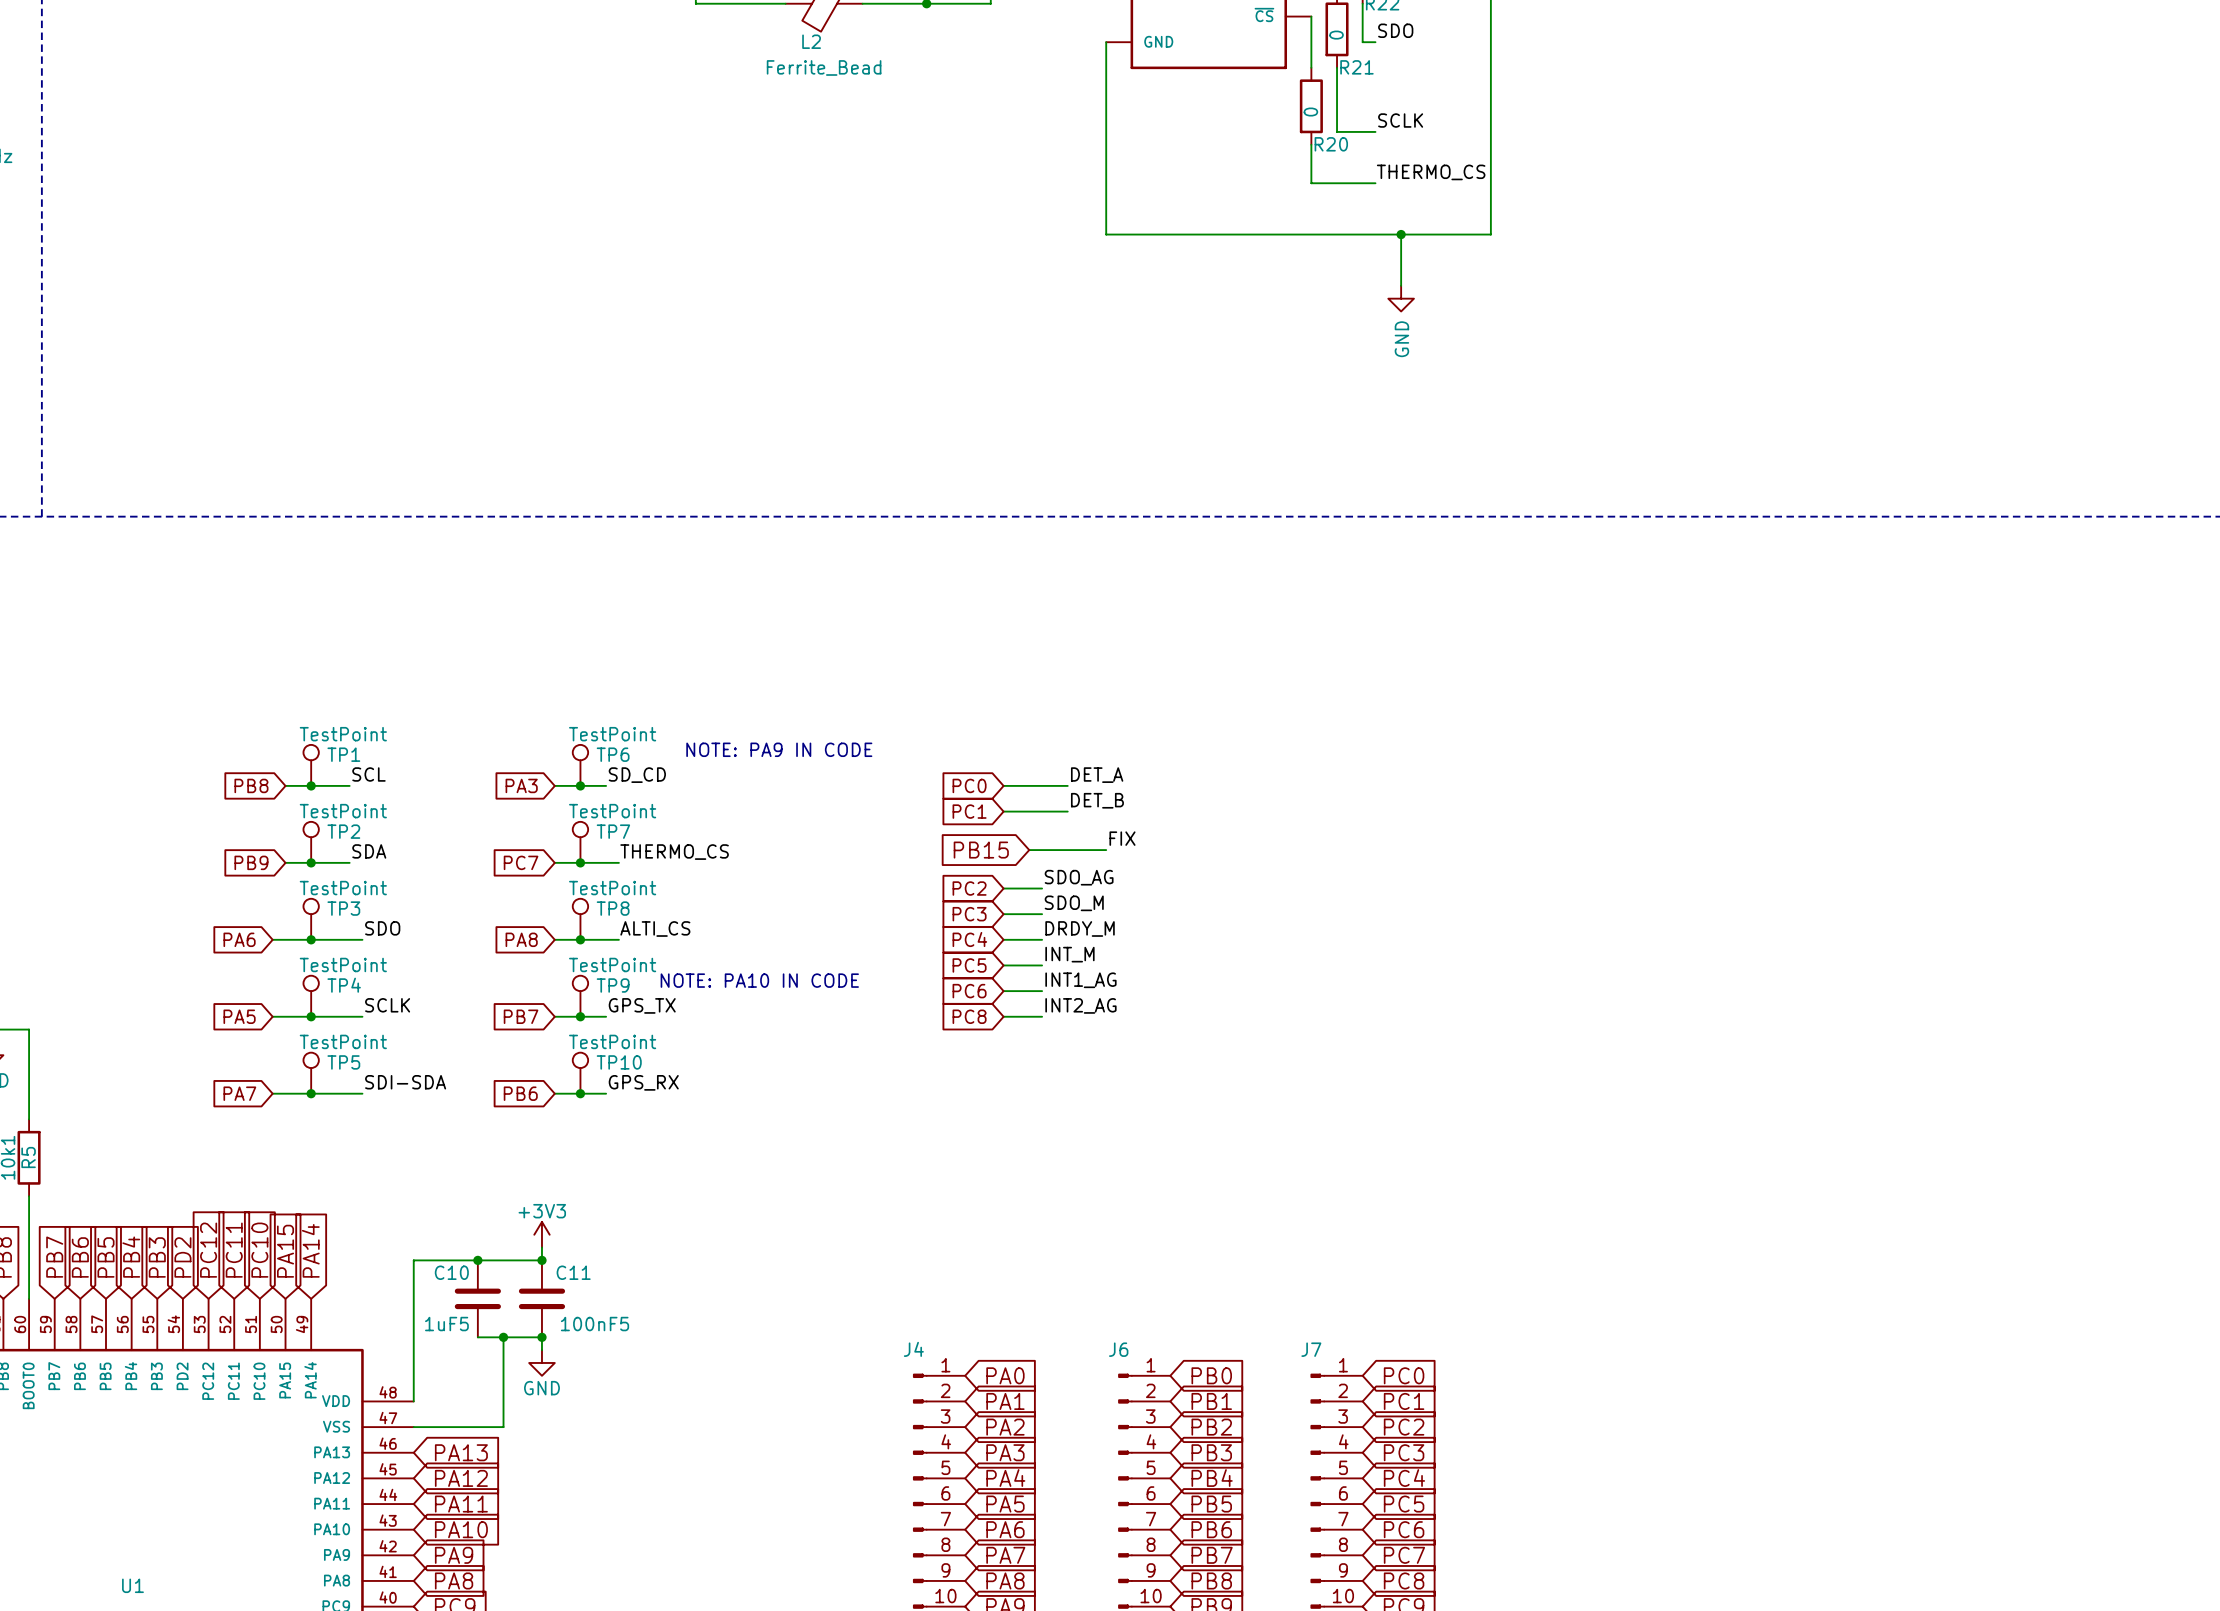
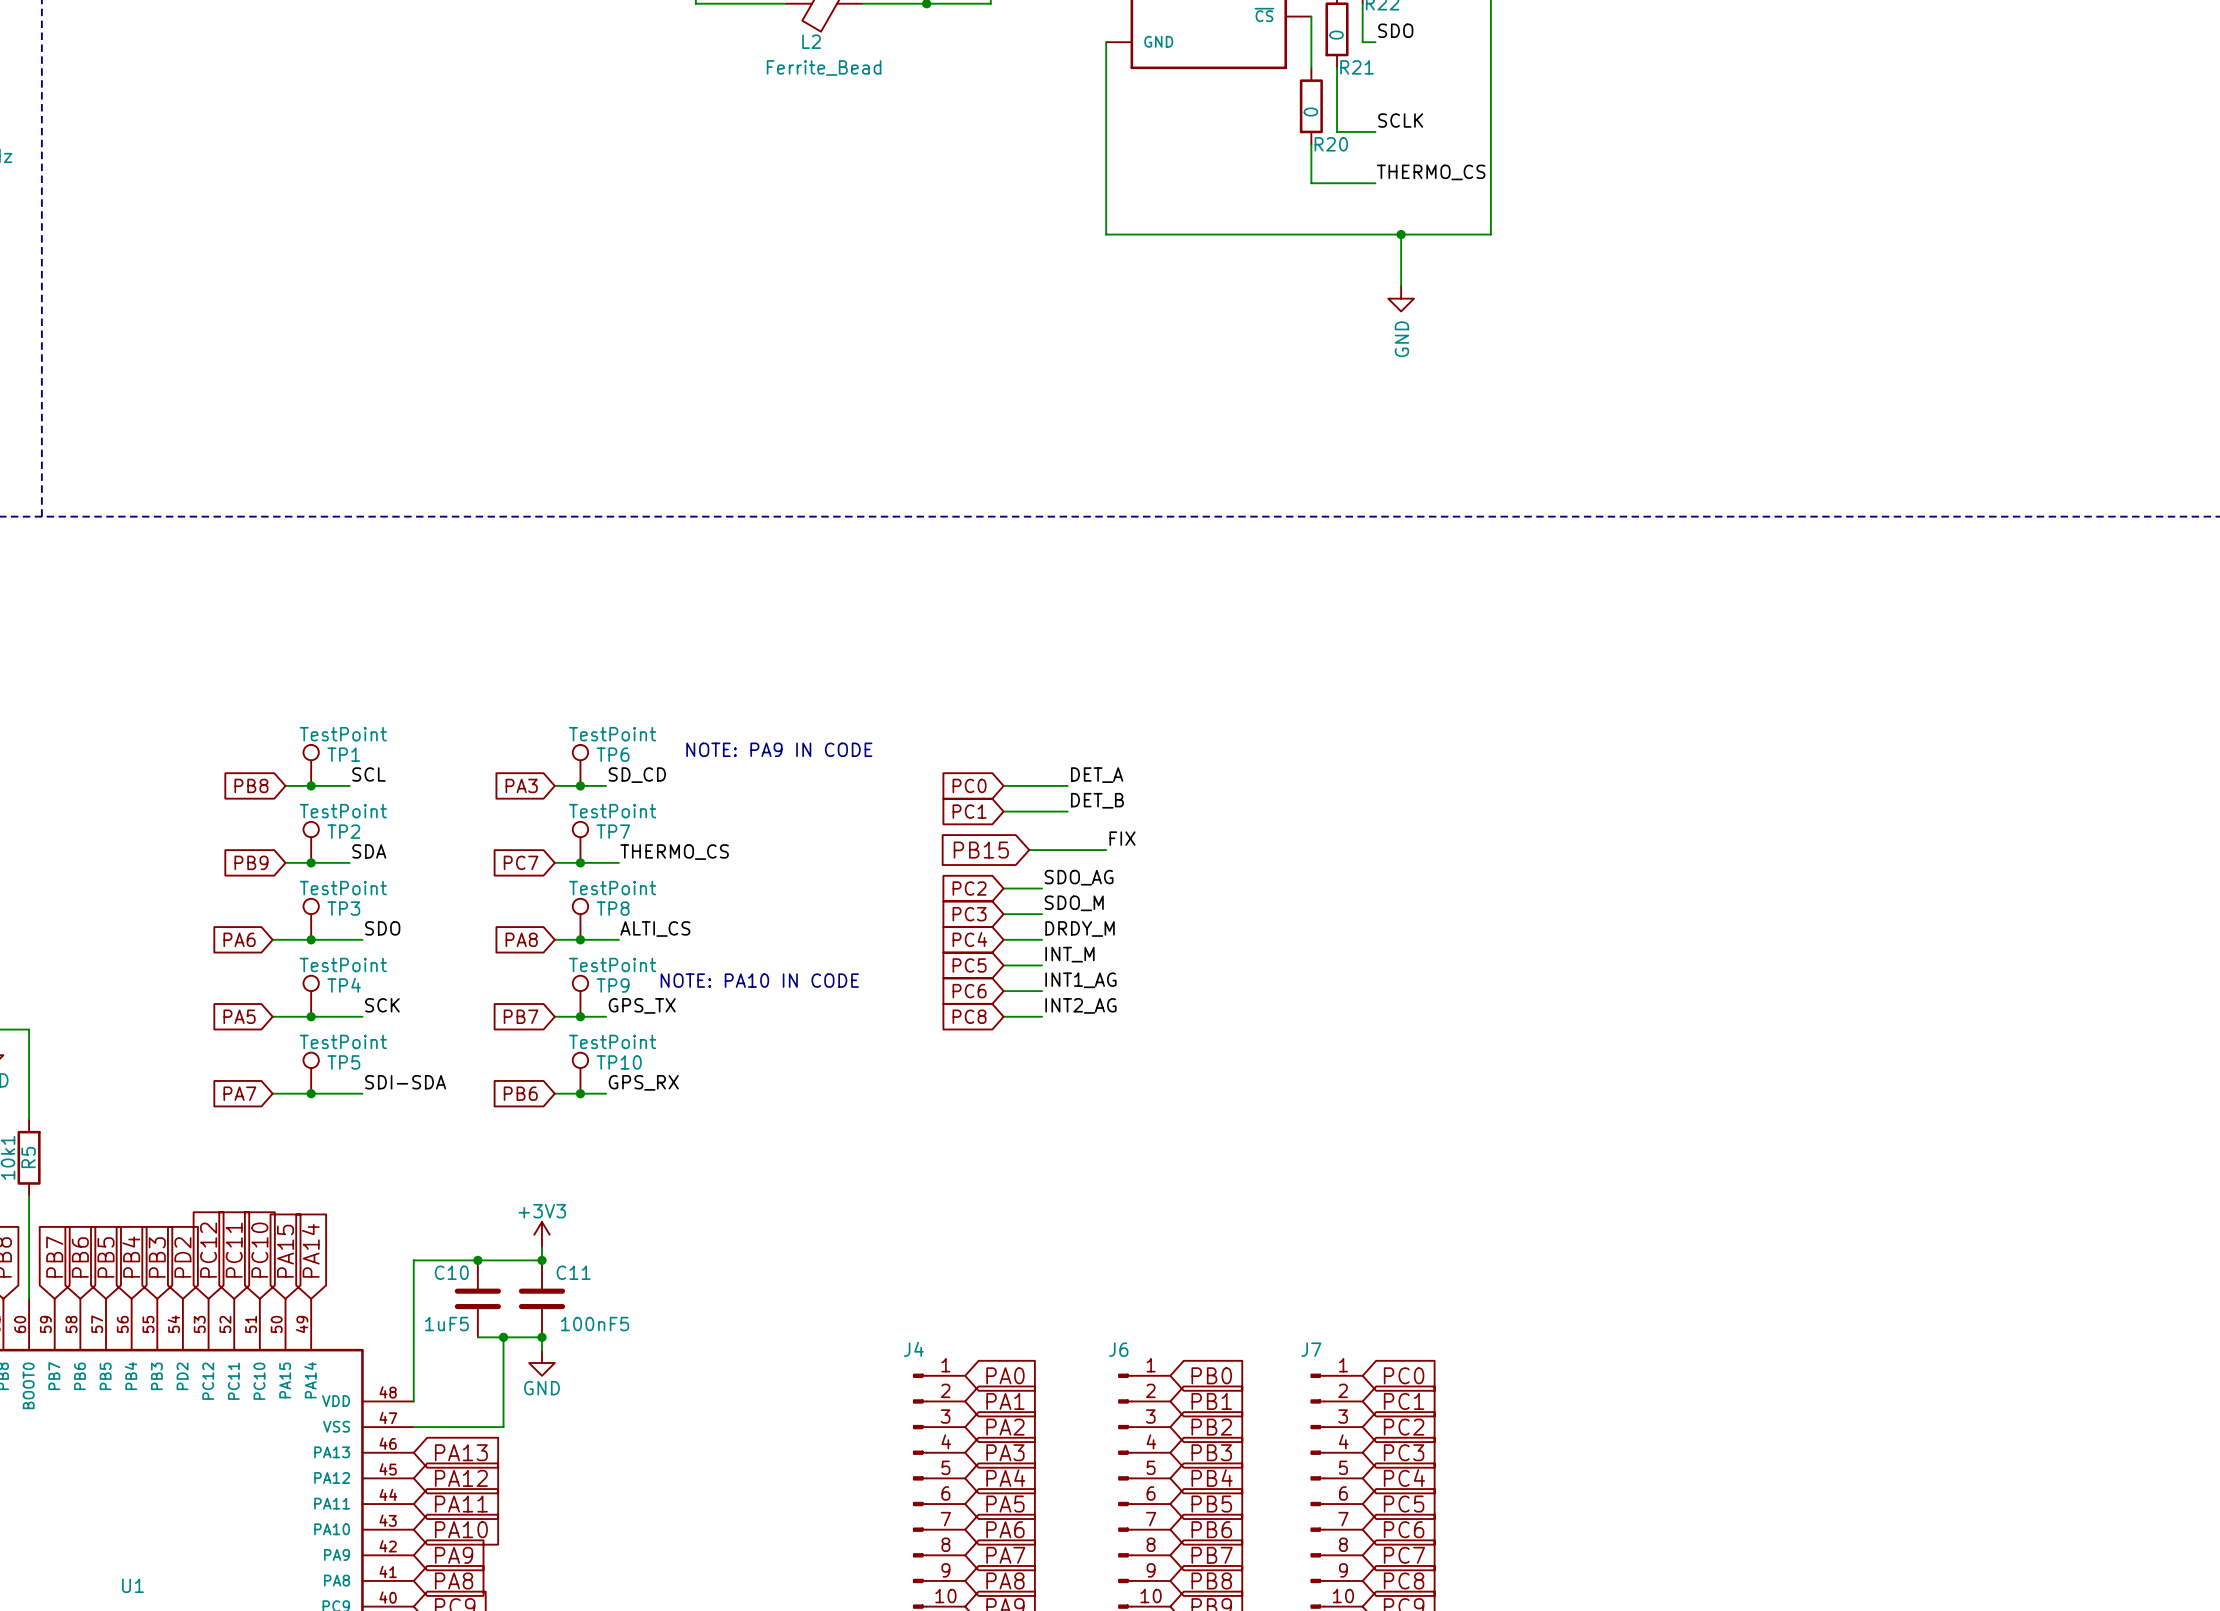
label: SCLK (387, 1005) -> SCK (382, 1005)

